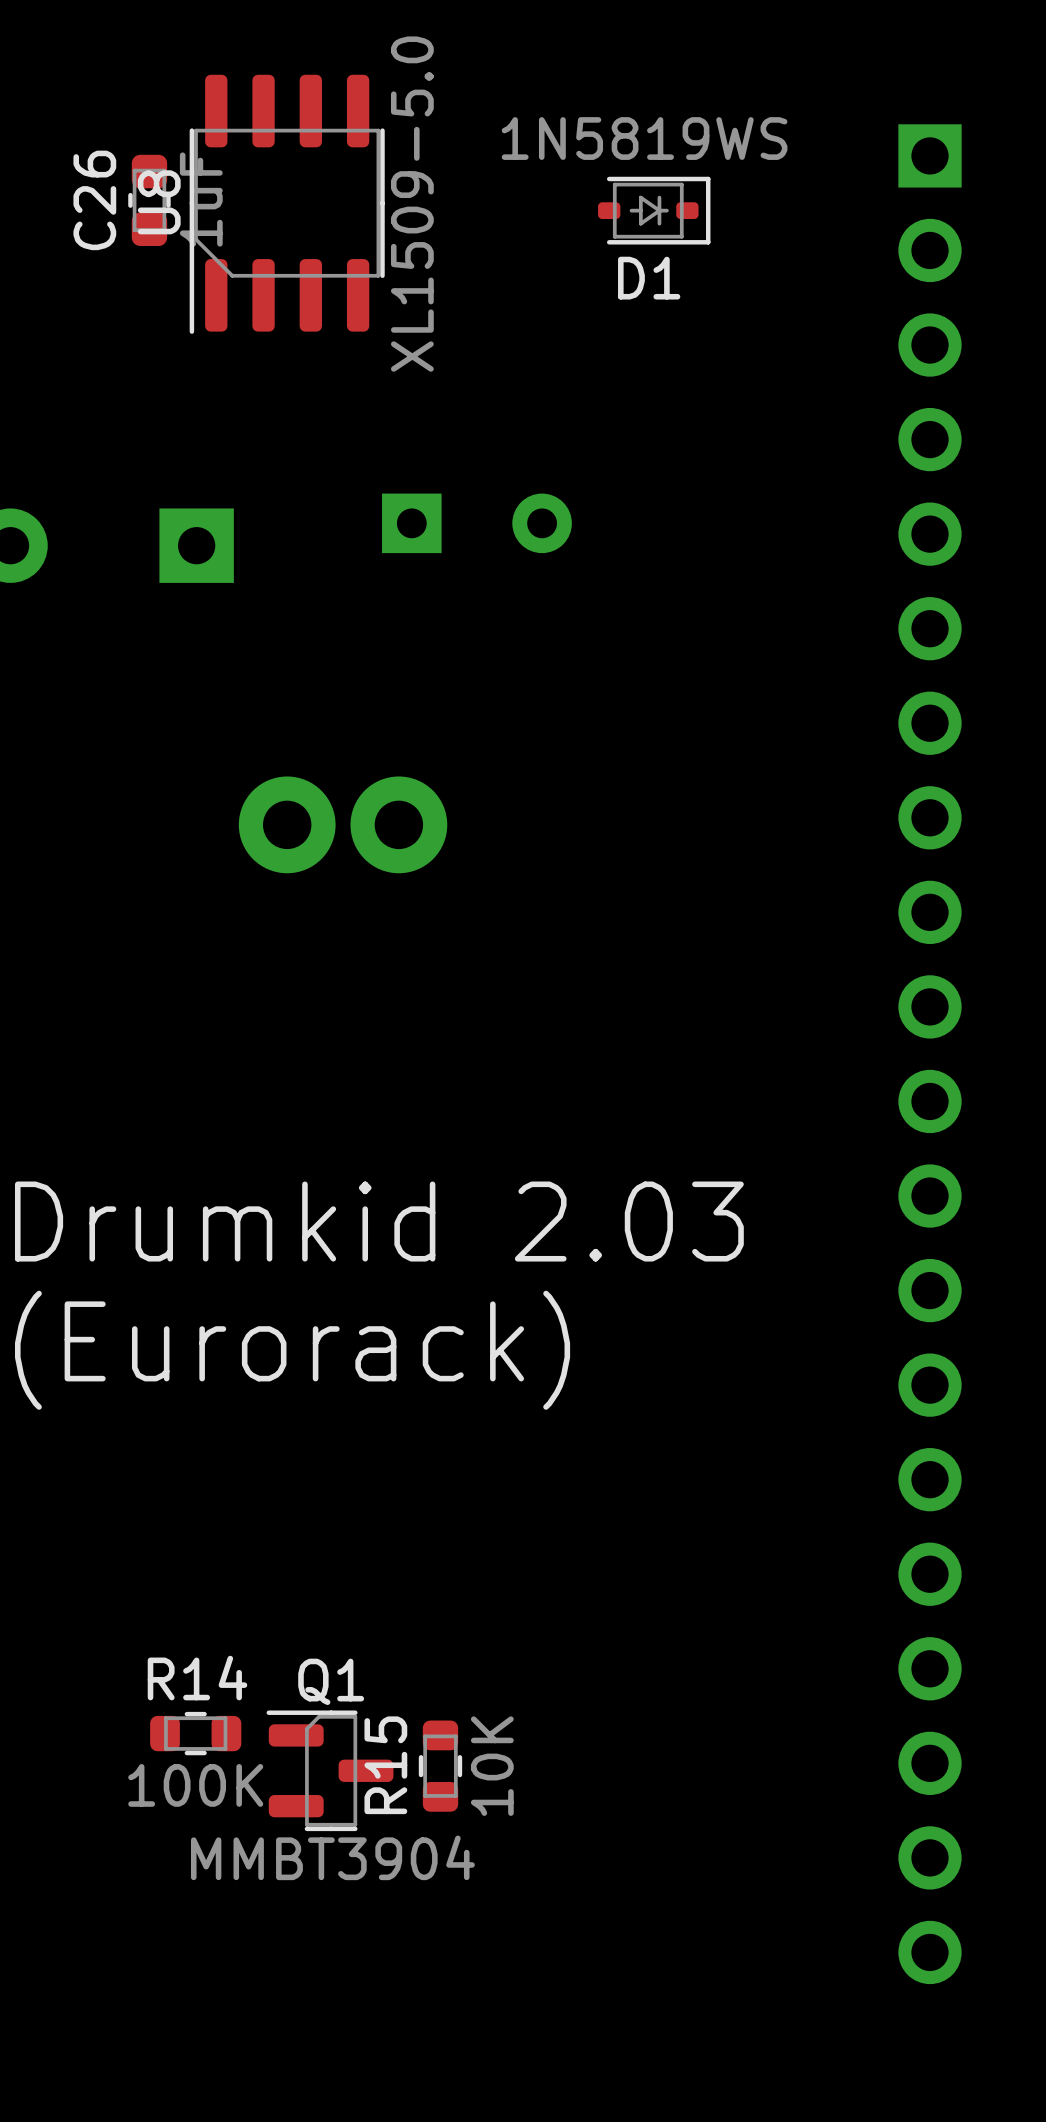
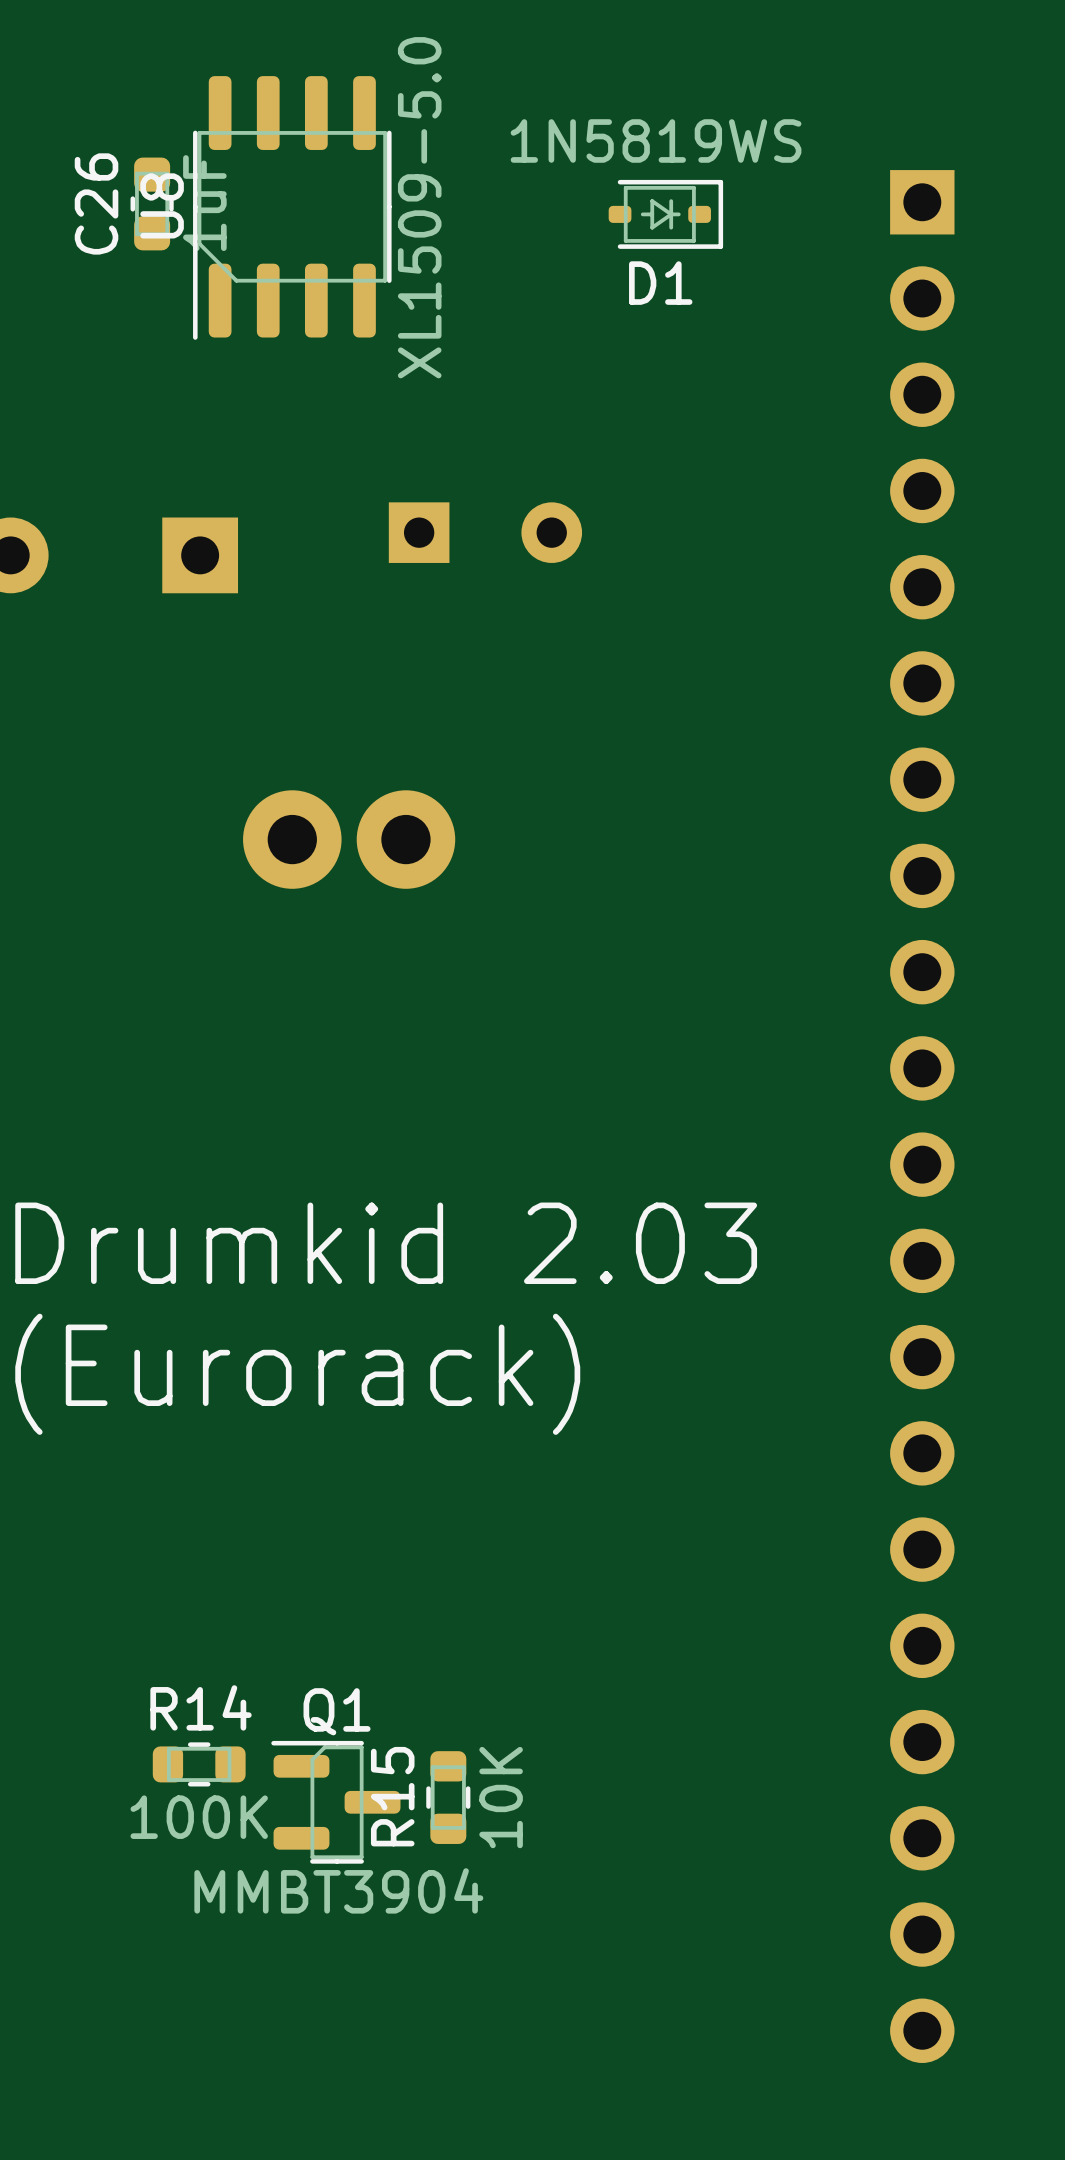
part position: (930, 1054) -> (922, 1116)

